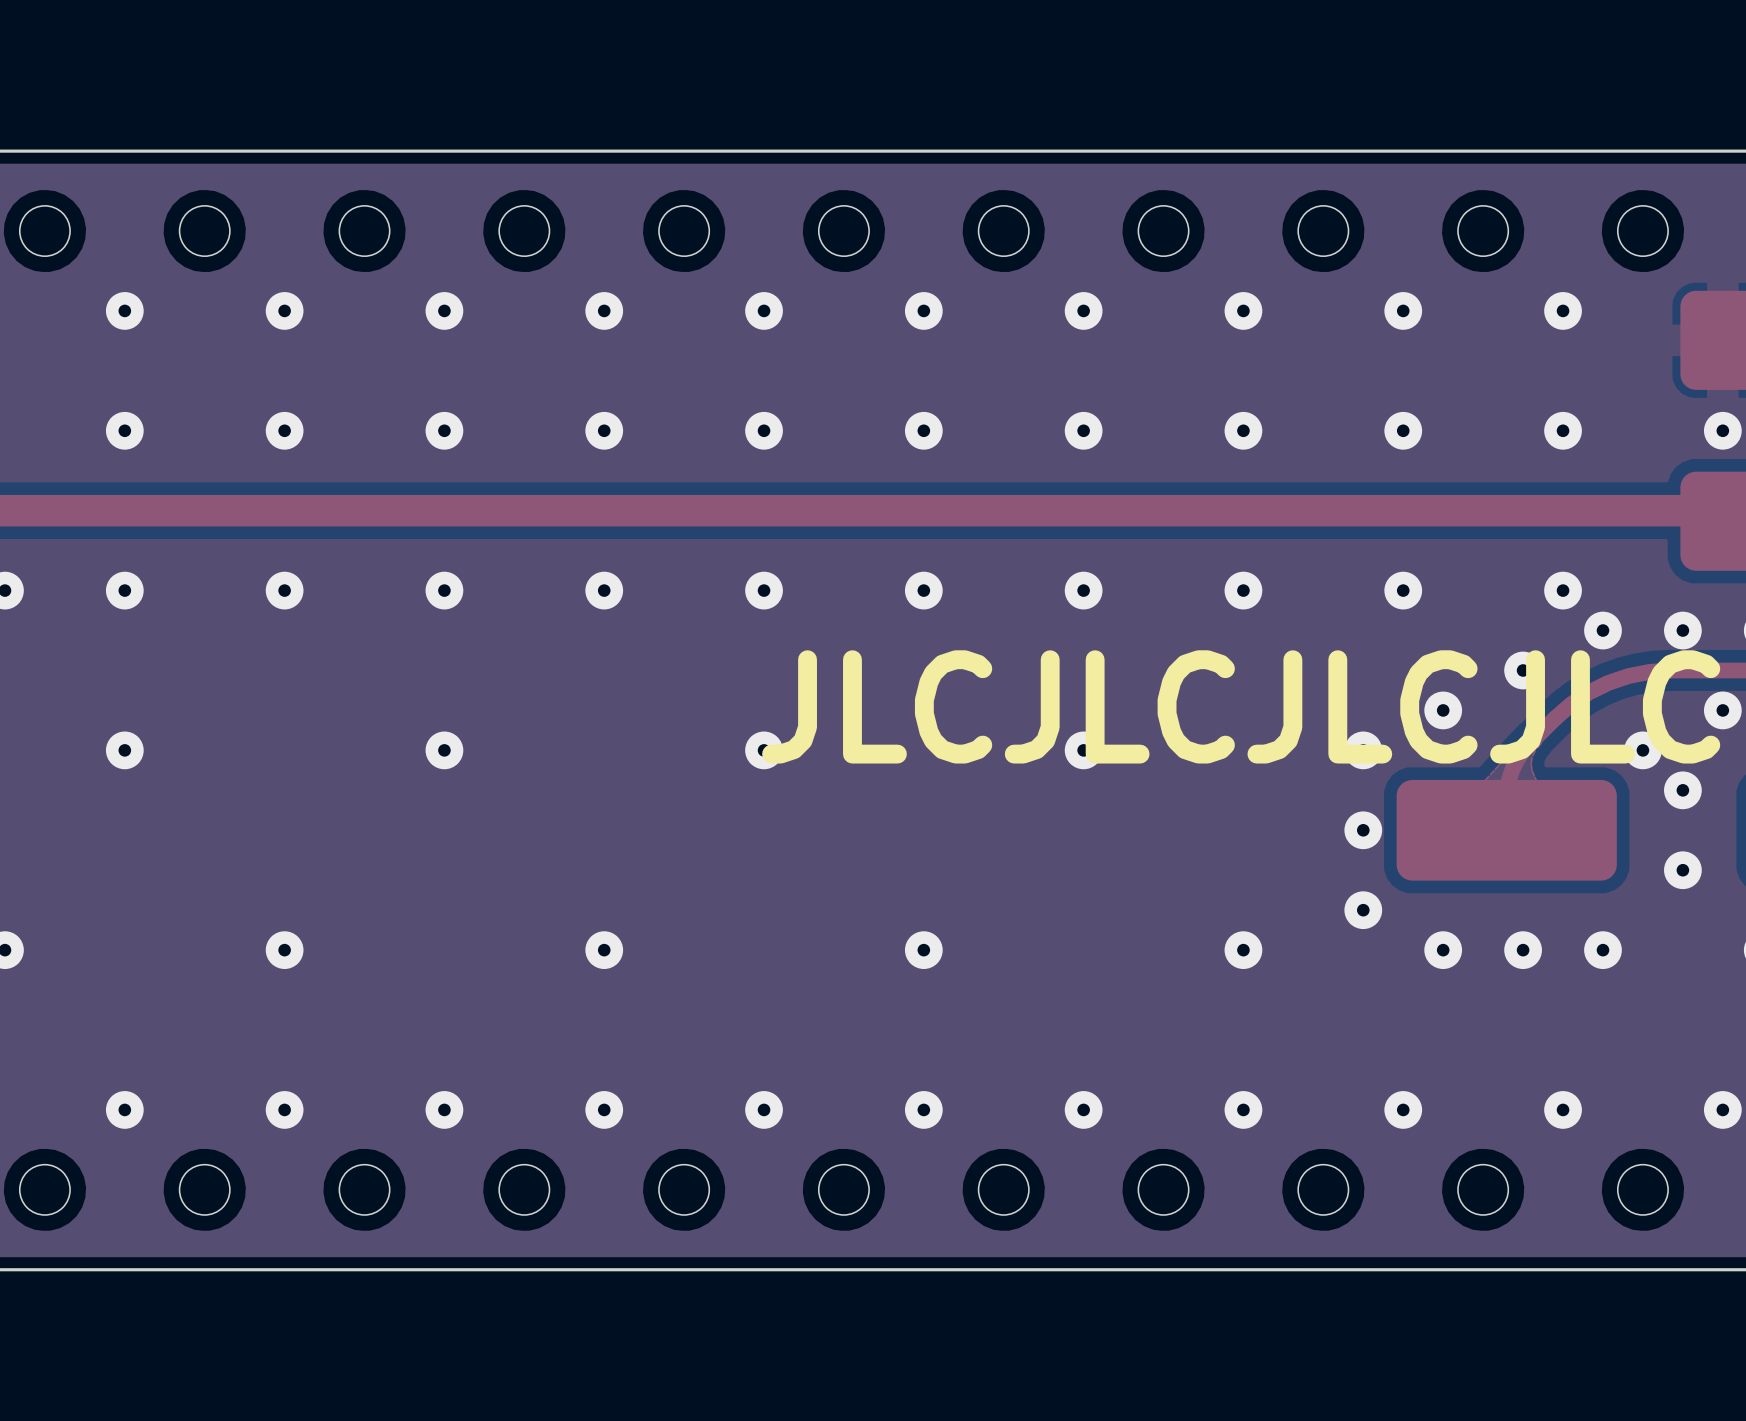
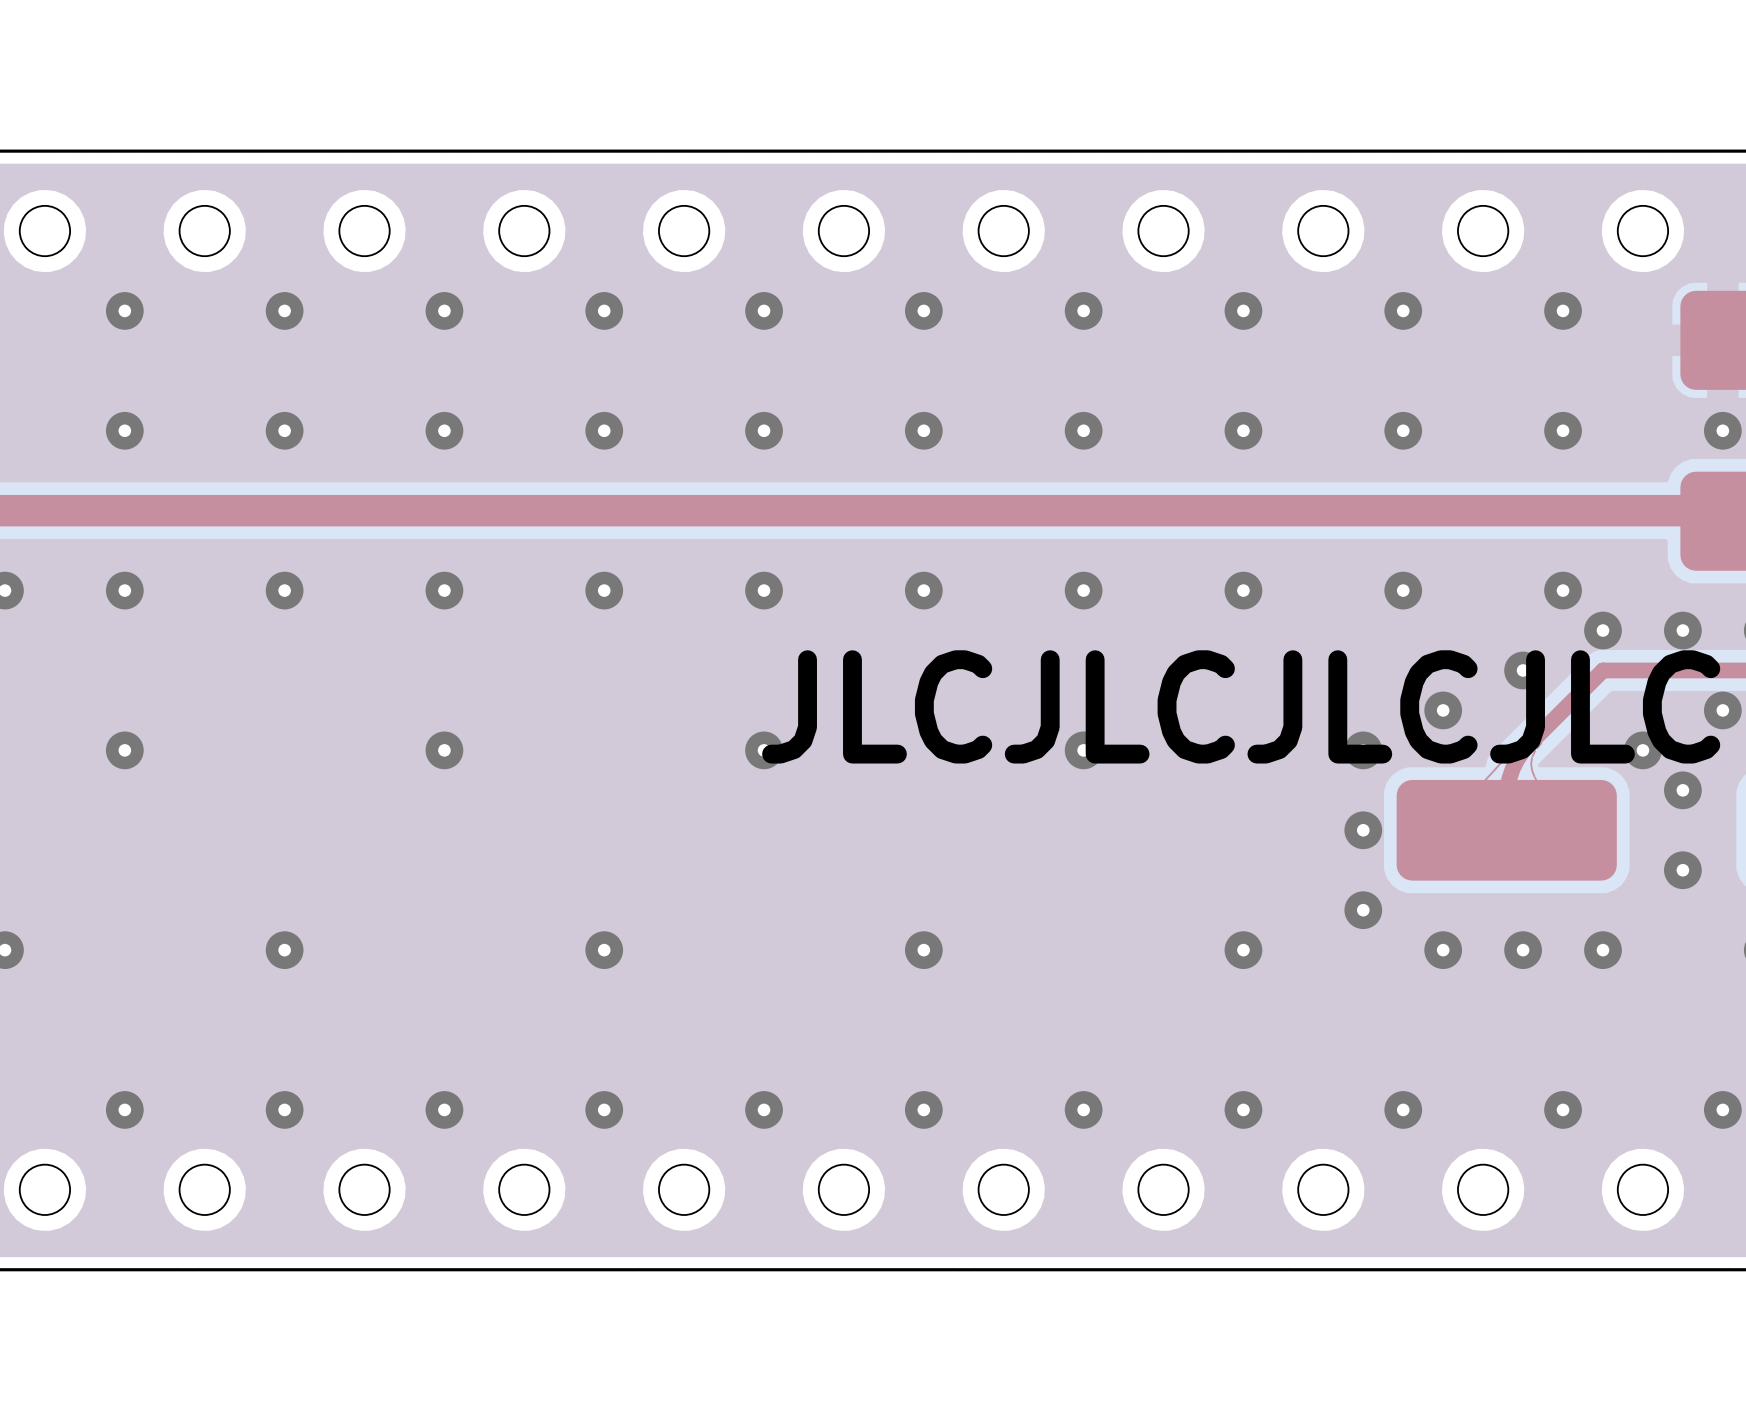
top track: (1671, 670) (1649, 671) (1608, 682) (1571, 704) (1554, 718) -> (1671, 670) (1602, 670) (1554, 718)

